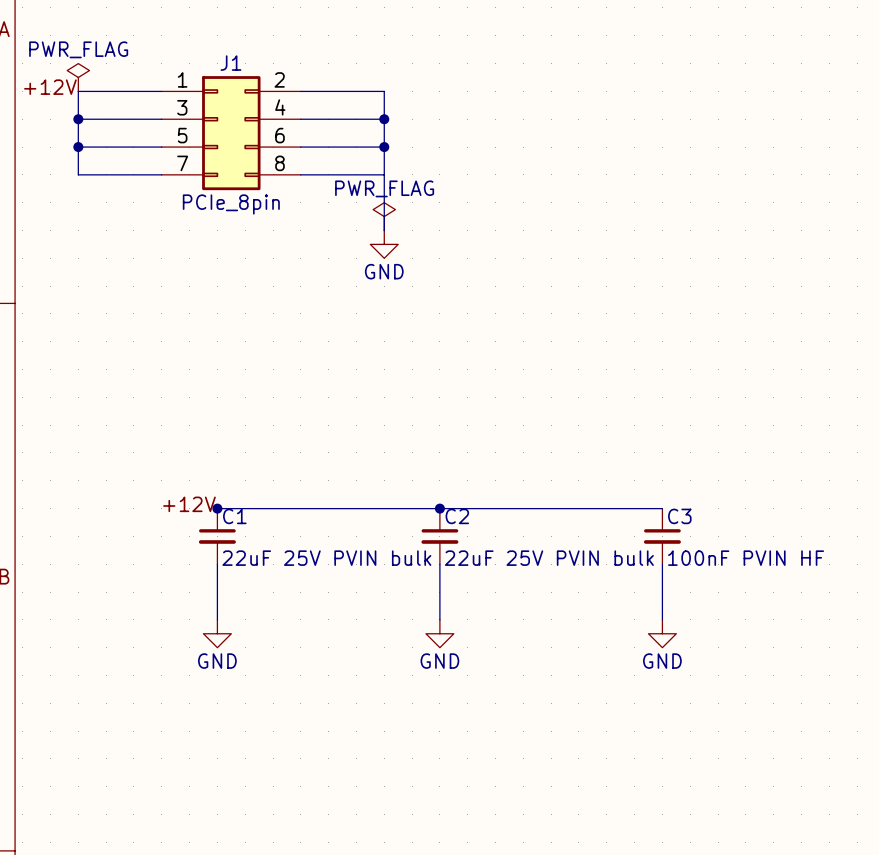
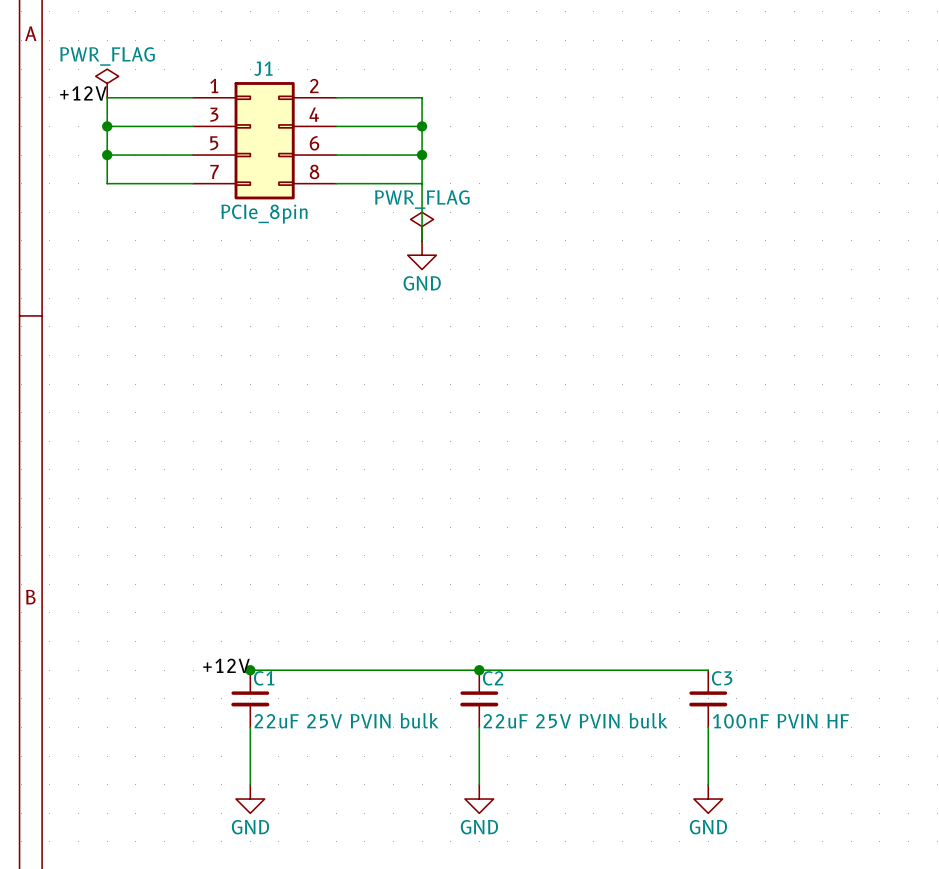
label position: +12V (189, 504) -> +12V (226, 665)
wire: (217, 508) (662, 508) -> (250, 670) (708, 670)
junction: (217, 508) -> none
junction: (439, 508) -> none
C1 position: (217, 536) -> (250, 698)
C2 position: (439, 536) -> (479, 698)
C3 position: (662, 536) -> (708, 698)
wire: (217, 564) (217, 619) -> (250, 727) (250, 784)
wire: (439, 564) (439, 619) -> (479, 727) (479, 784)
wire: (662, 564) (662, 619) -> (708, 727) (708, 784)
power symbol: GND (217, 633) -> none
power symbol: GND (439, 633) -> none
power symbol: GND (662, 633) -> none
junction: none -> (250, 670)
junction: none -> (479, 670)
power symbol: none -> GND (250, 799)
power symbol: none -> GND (479, 799)
power symbol: none -> GND (708, 799)

